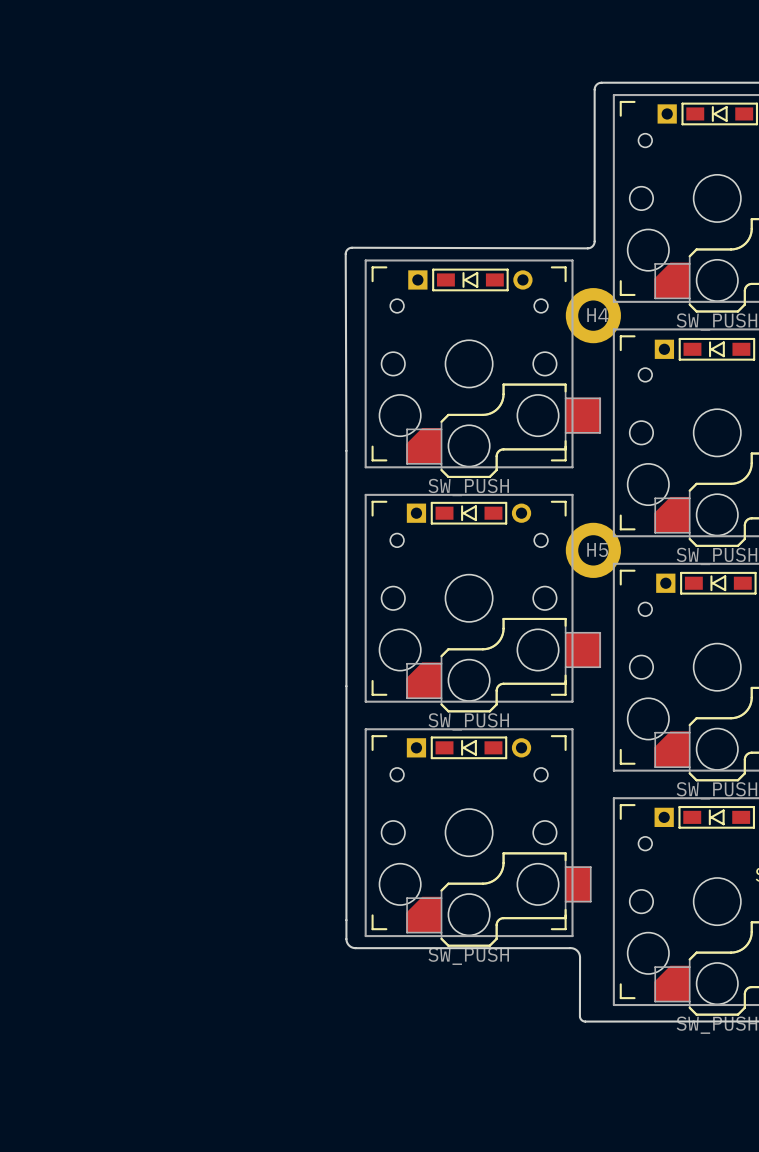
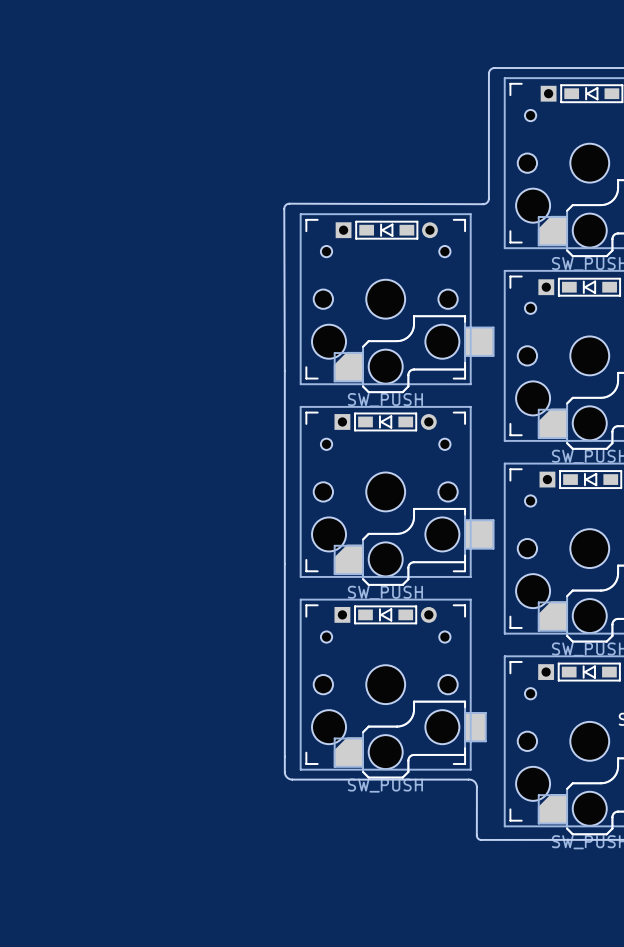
H4: (593, 315) -> none
H5: (593, 550) -> none

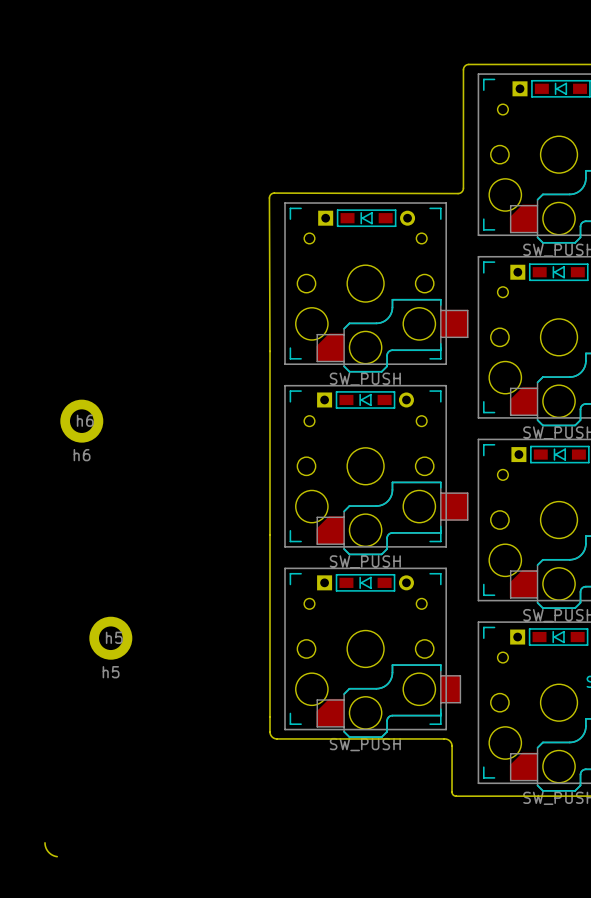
h6: none -> h6 (81, 421)
h5: none -> h5 (110, 638)
board edge: none -> (44, 842) (48, 852) (57, 856)

